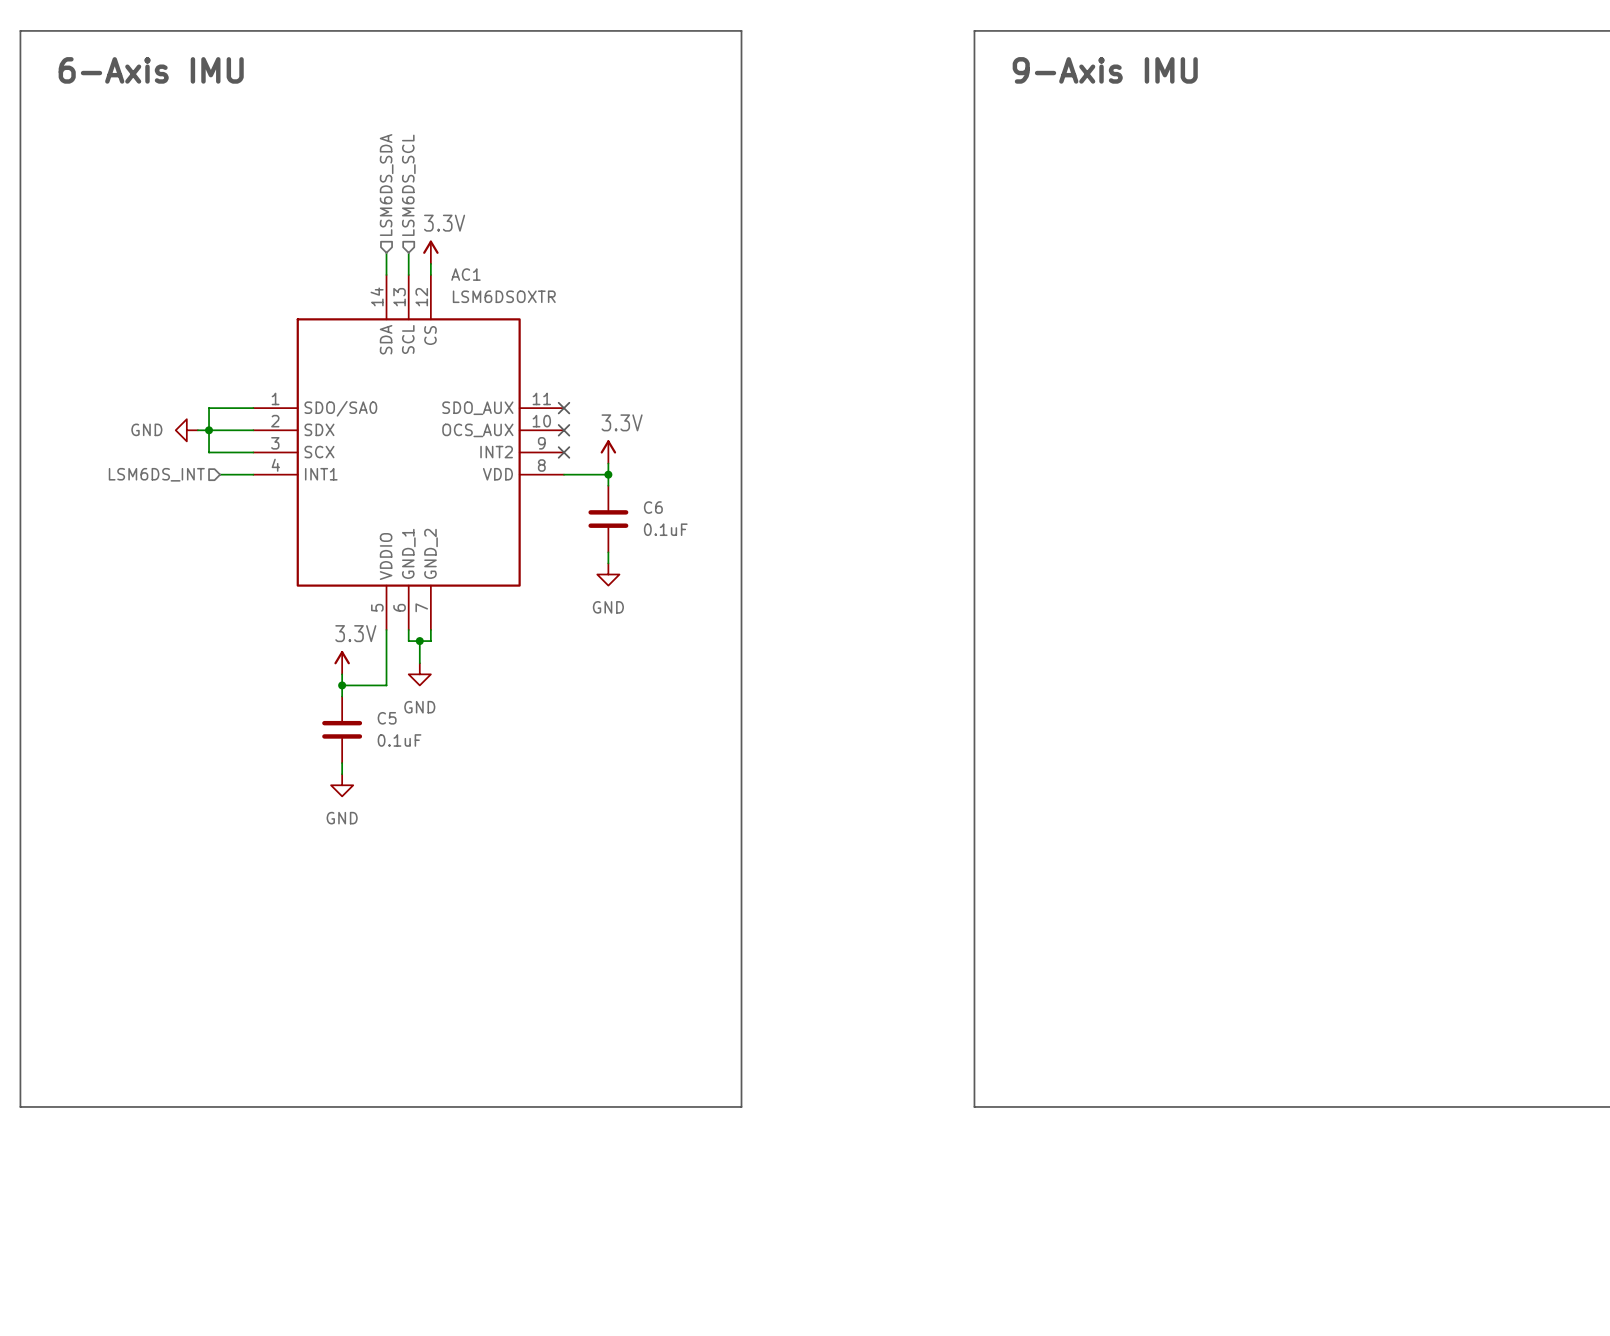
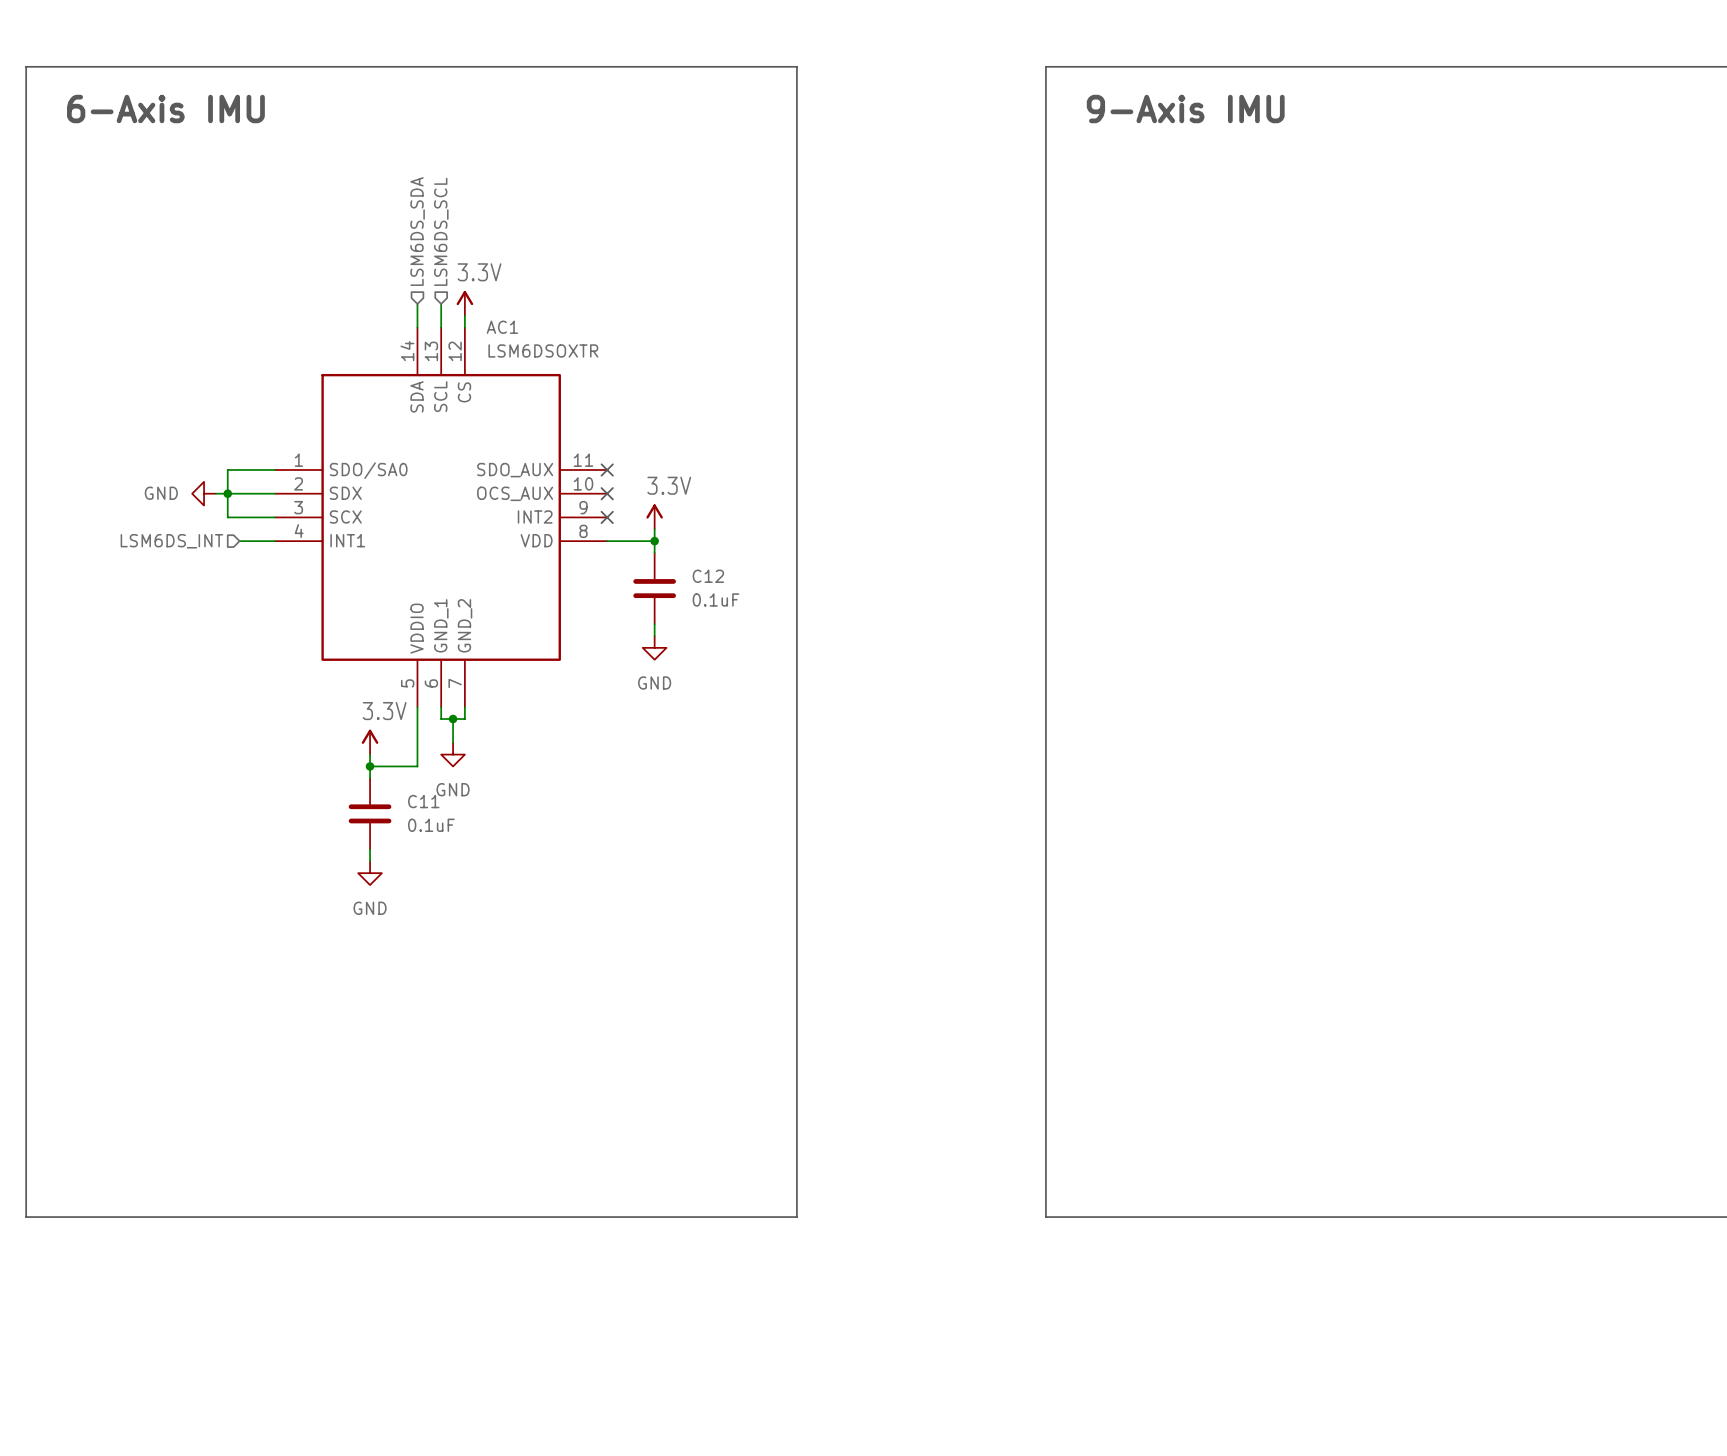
C6 name: C6 (653, 507) -> C12 (708, 576)
C5 name: C5 (387, 718) -> C11 (423, 801)

